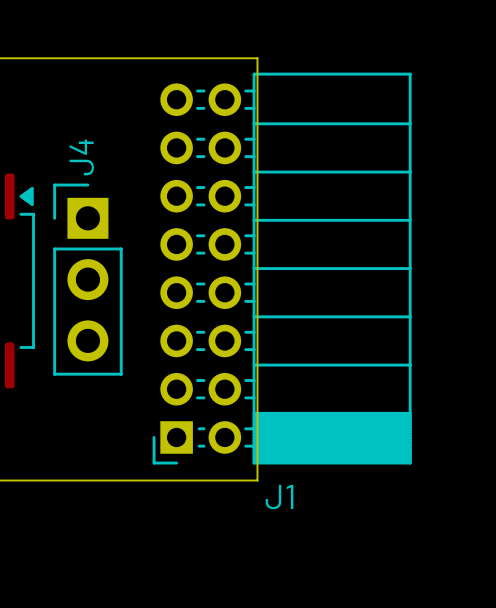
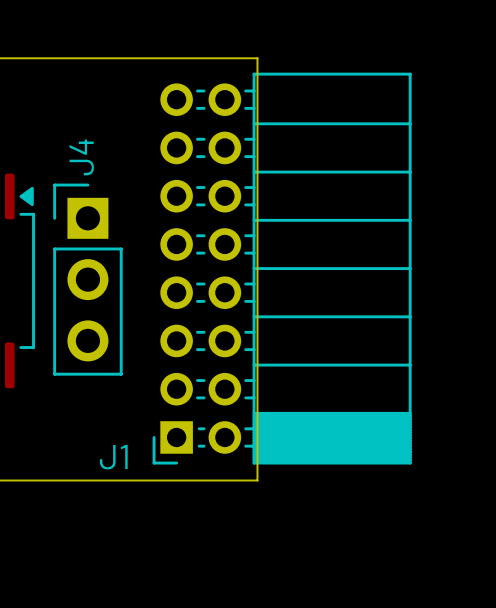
J1 name position: J1 (279, 497) -> J1 (113, 457)

